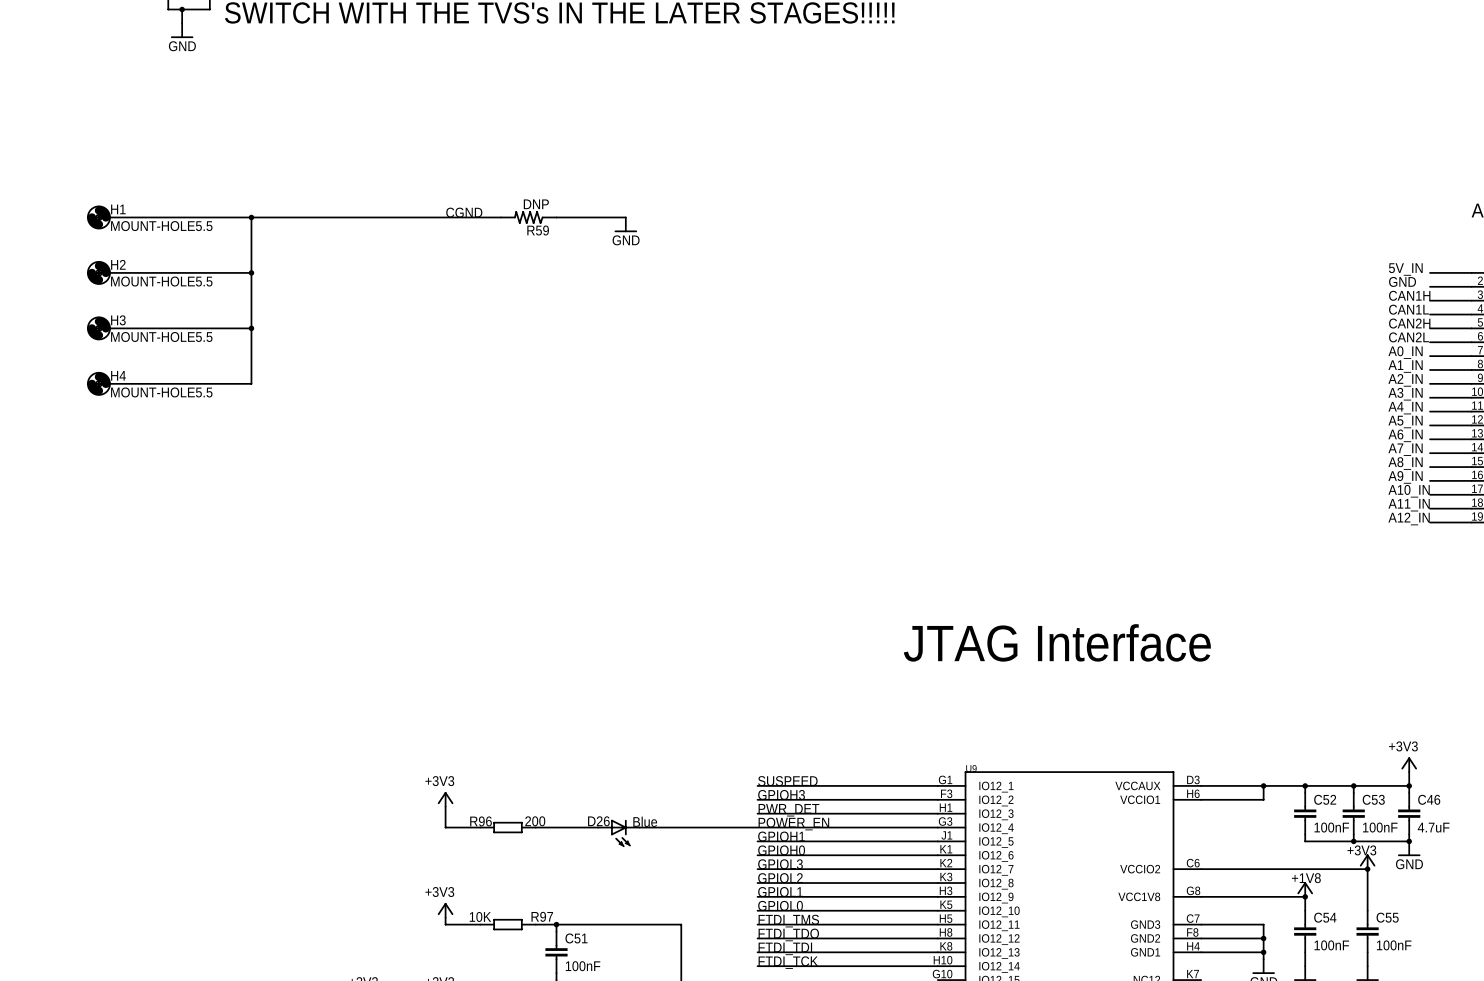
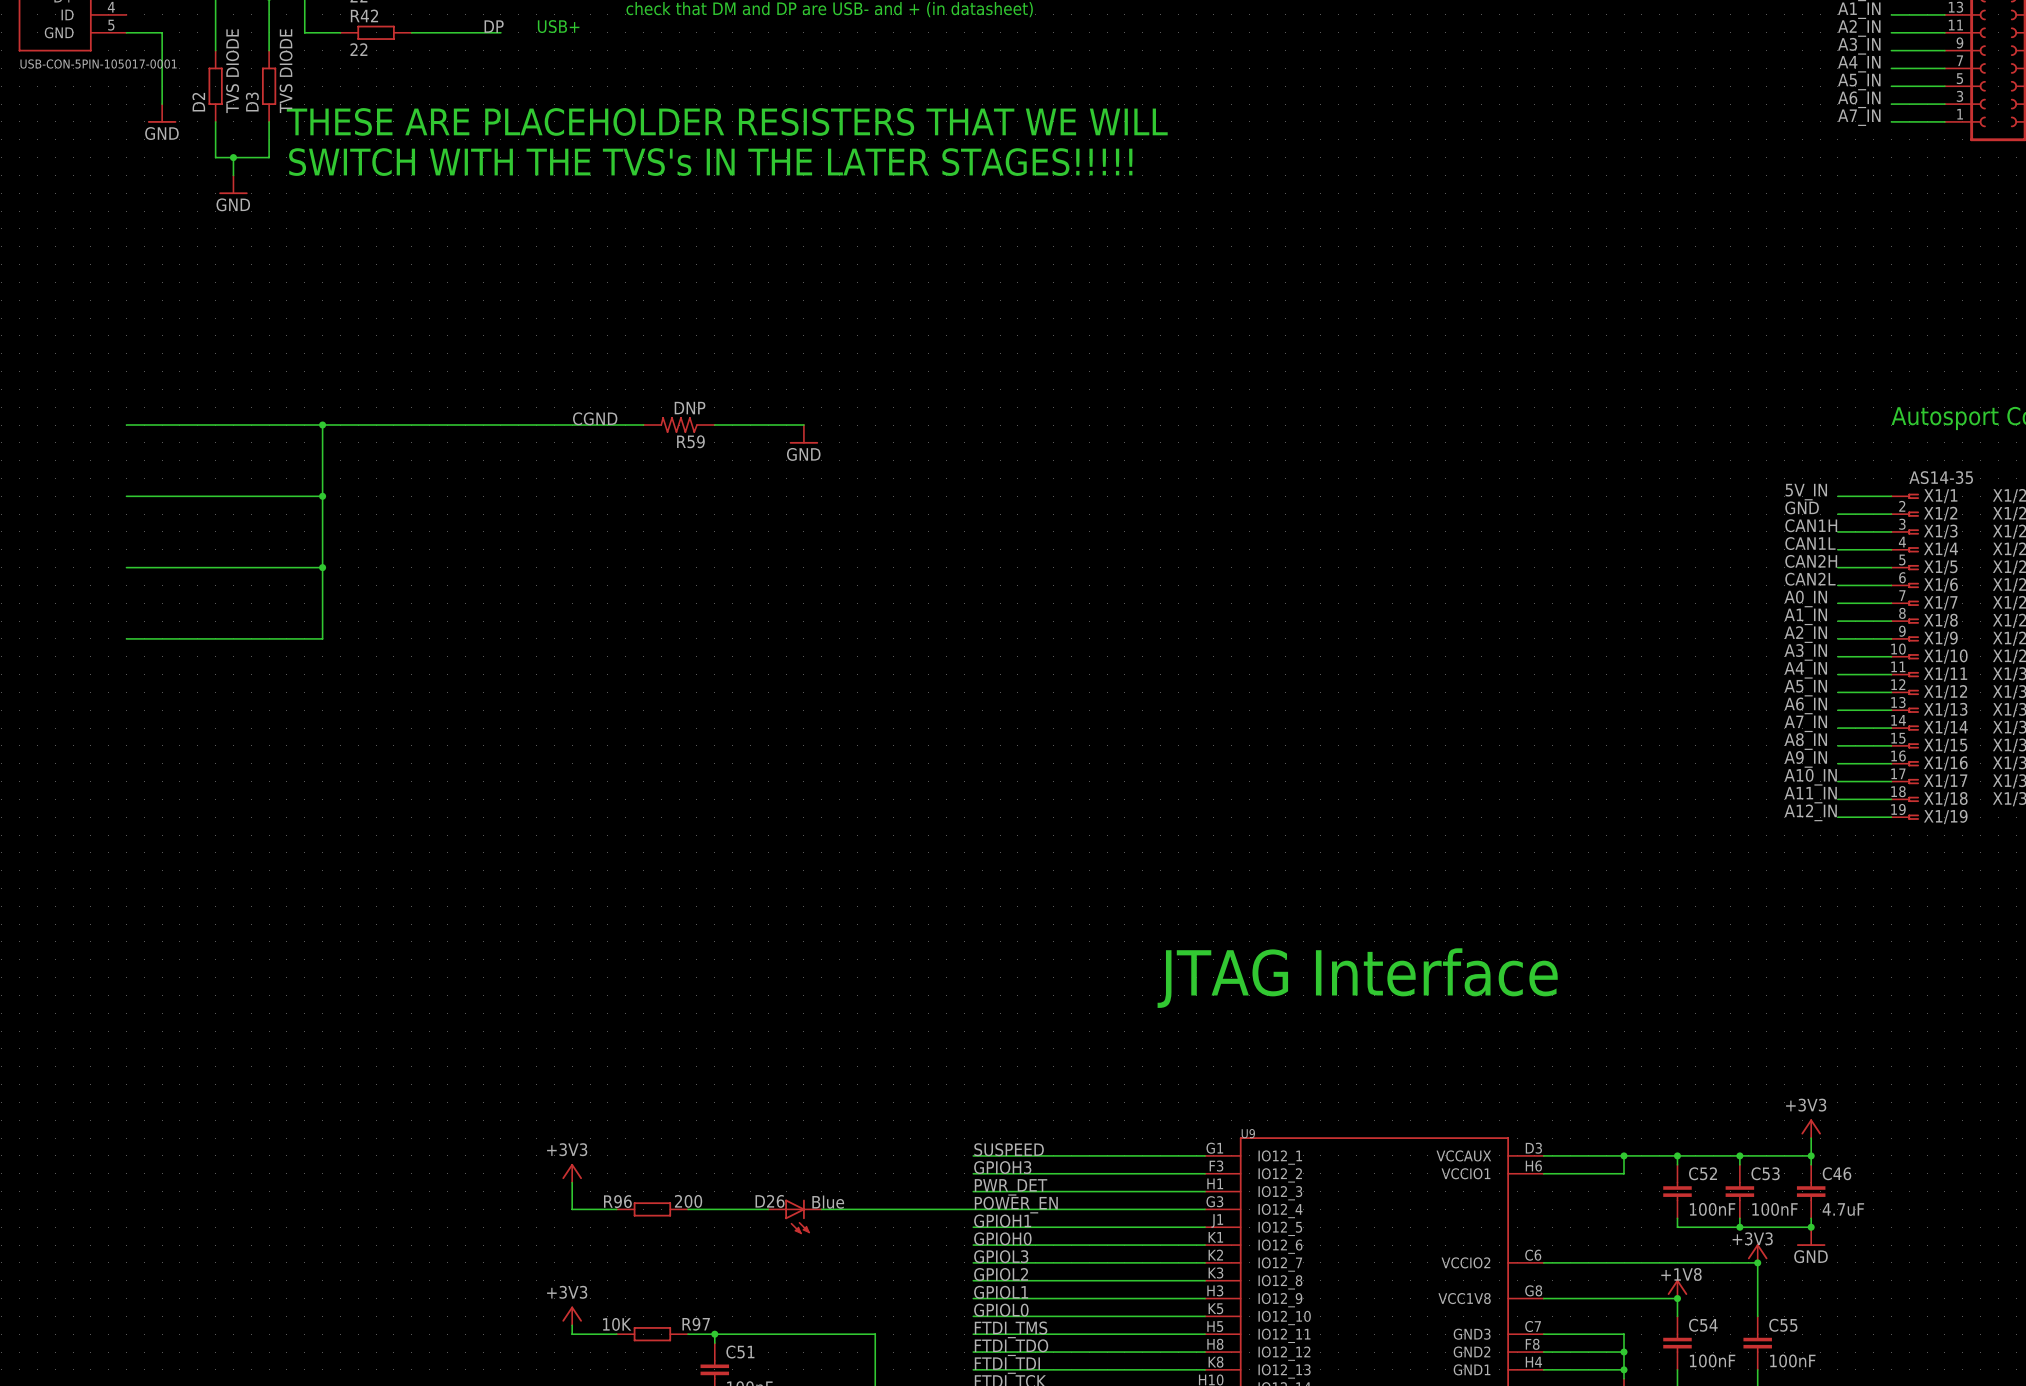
H1: MOUNT-HOLE5.5 (98, 217) -> none
H2: MOUNT-HOLE5.5 (98, 272) -> none
H3: MOUNT-HOLE5.5 (98, 328) -> none
H4: MOUNT-HOLE5.5 (98, 383) -> none

